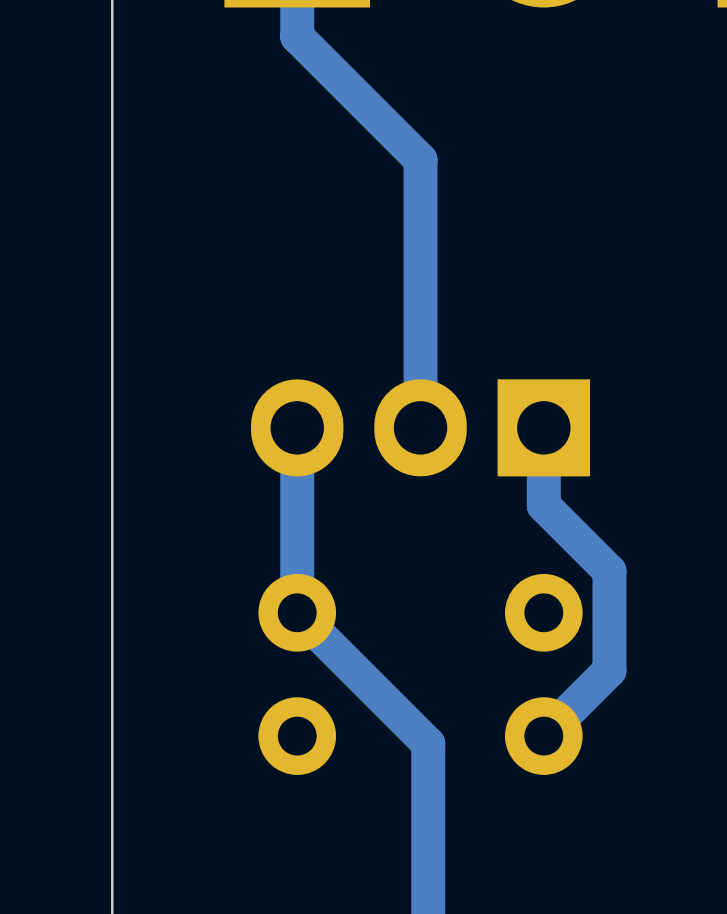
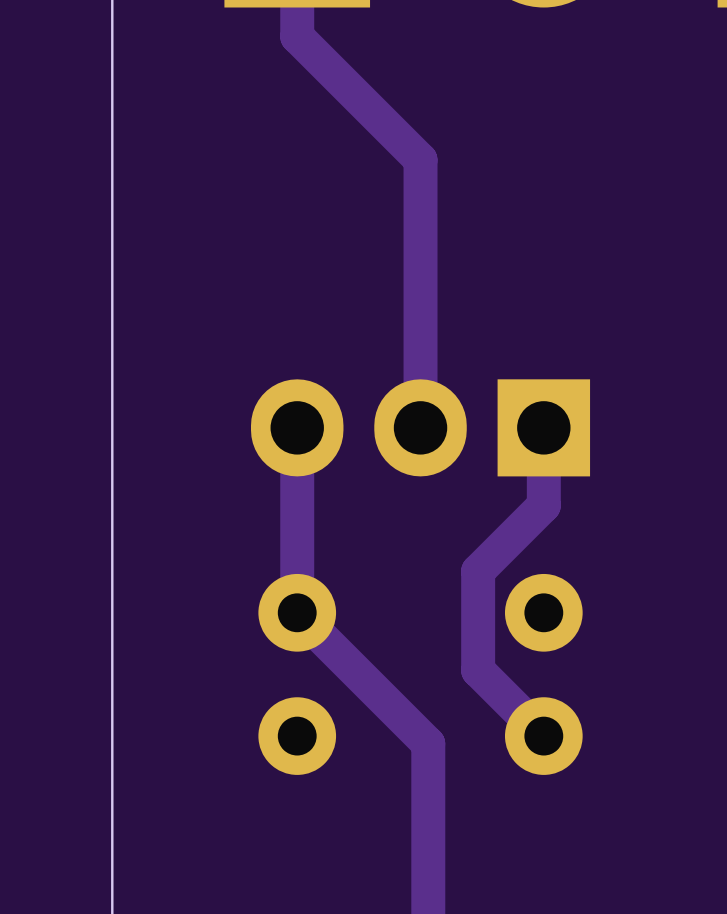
track: (543, 505) (609, 571) (609, 670) (543, 736) -> (543, 505) (478, 571) (478, 670) (543, 736)

